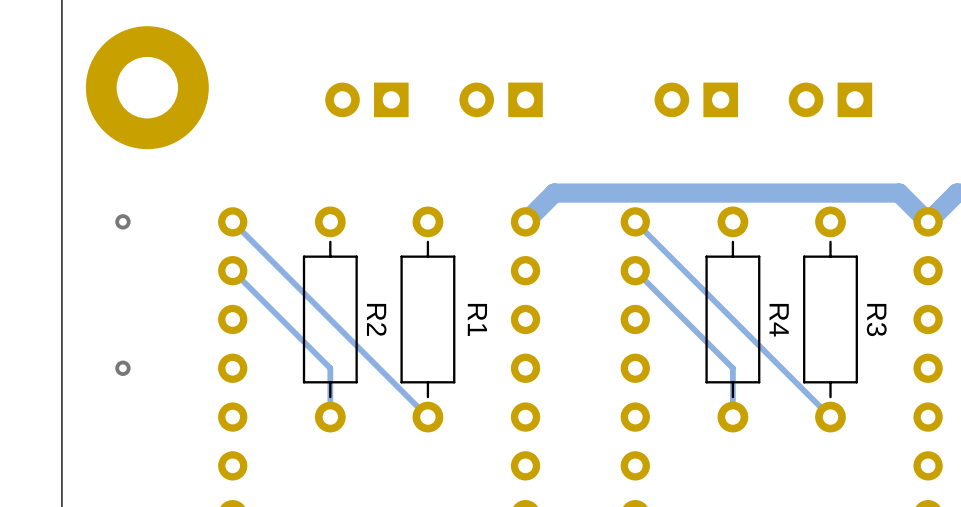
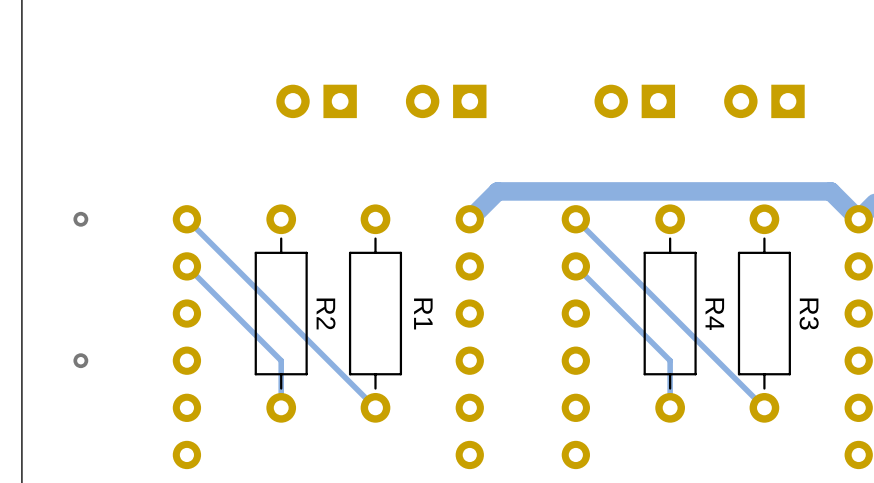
part: (147, 87) -> none

